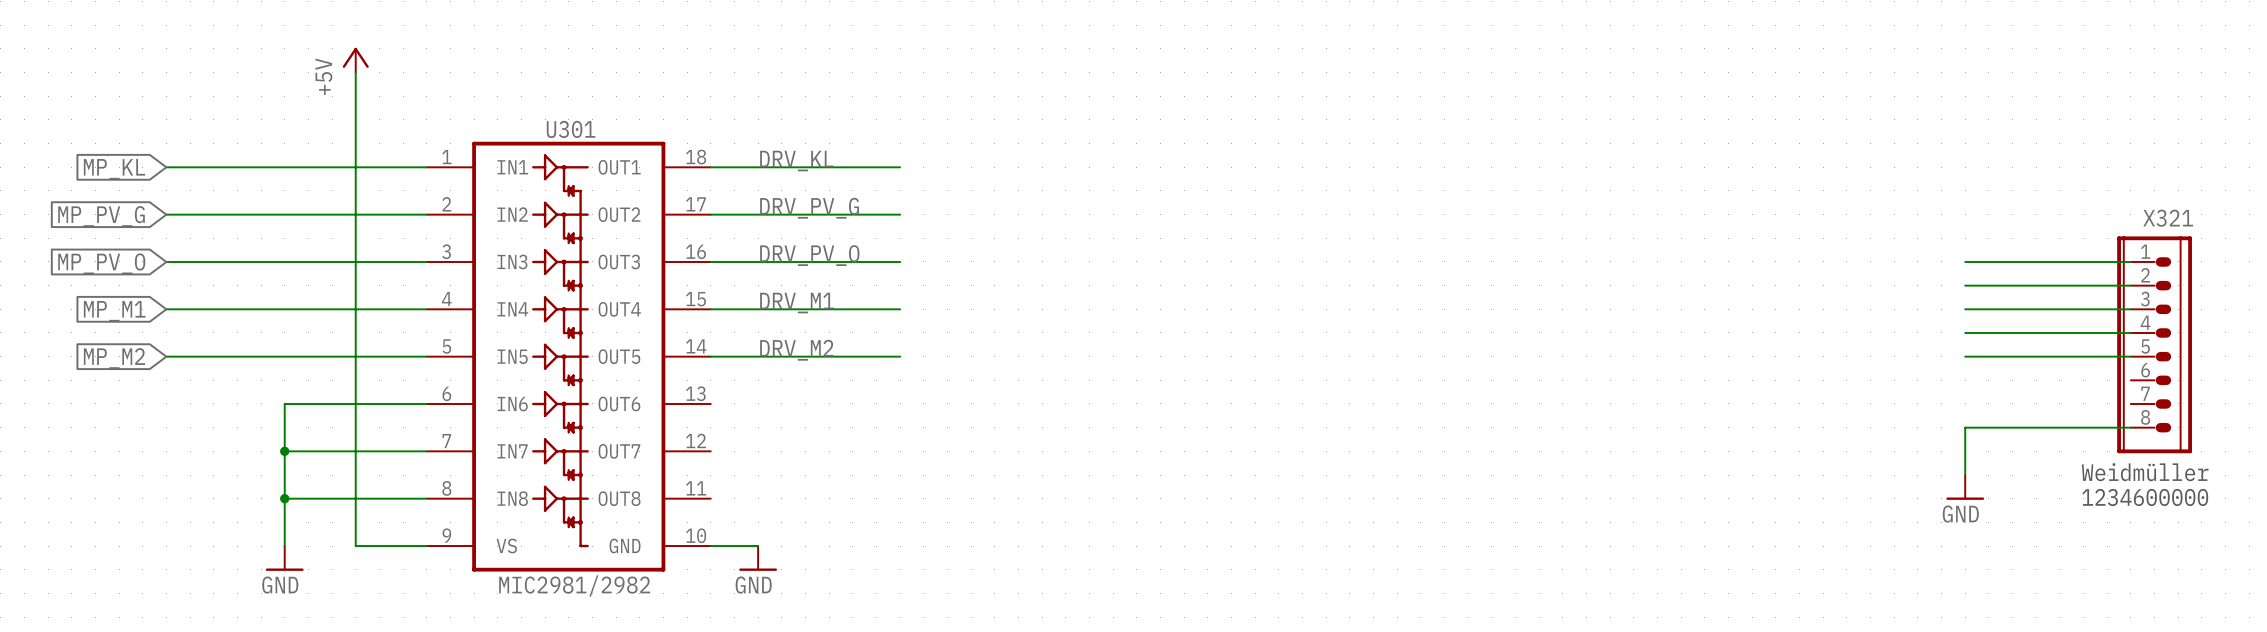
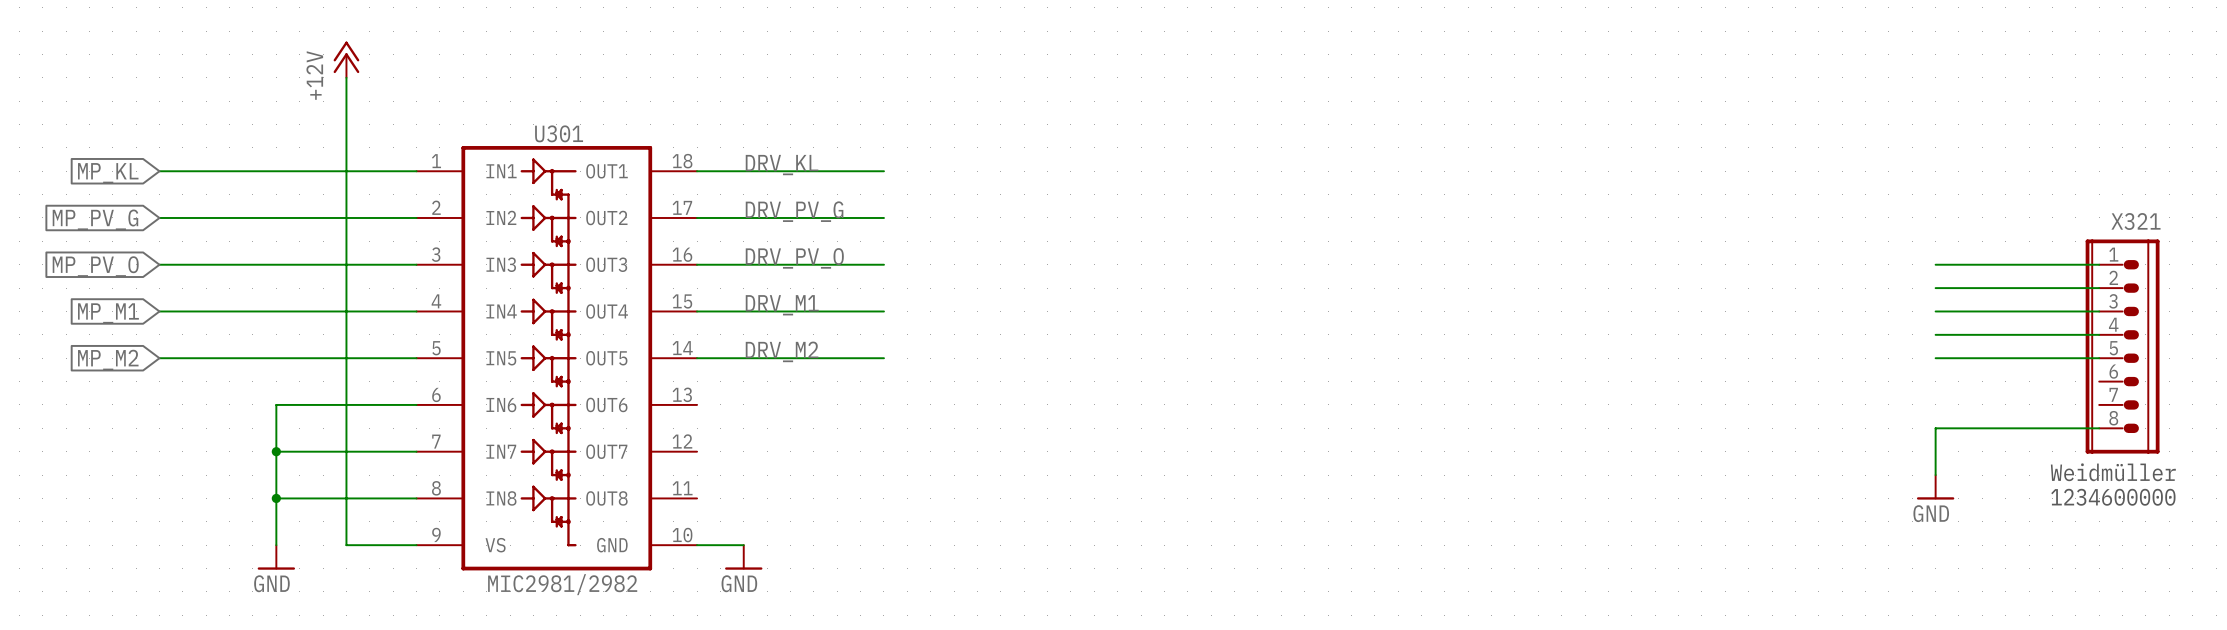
power symbol: +5V (355, 60) -> +12V (346, 59)

